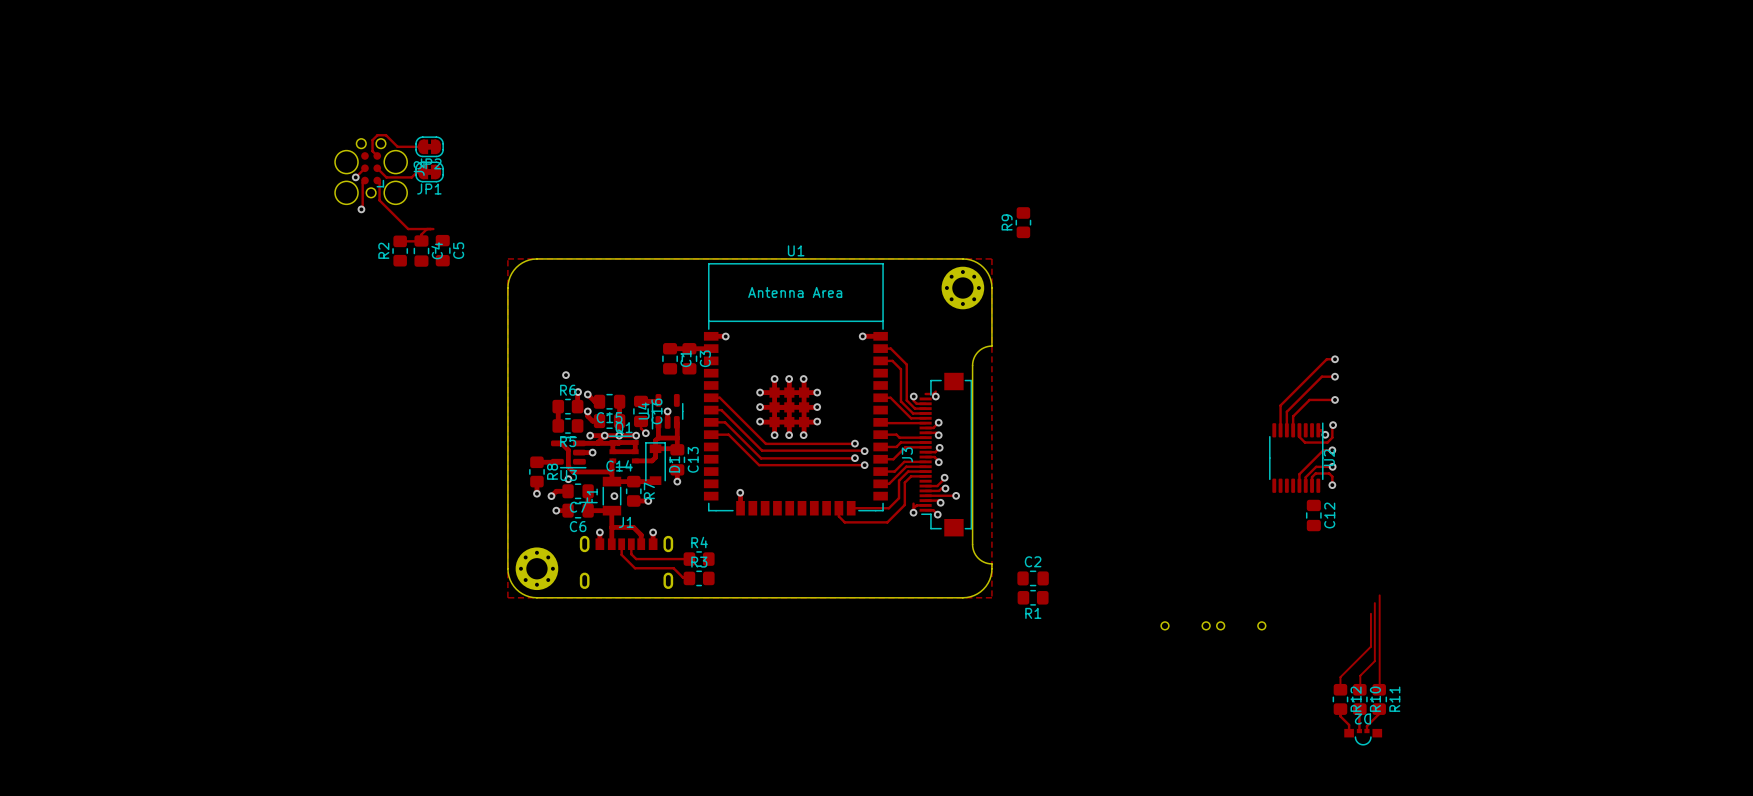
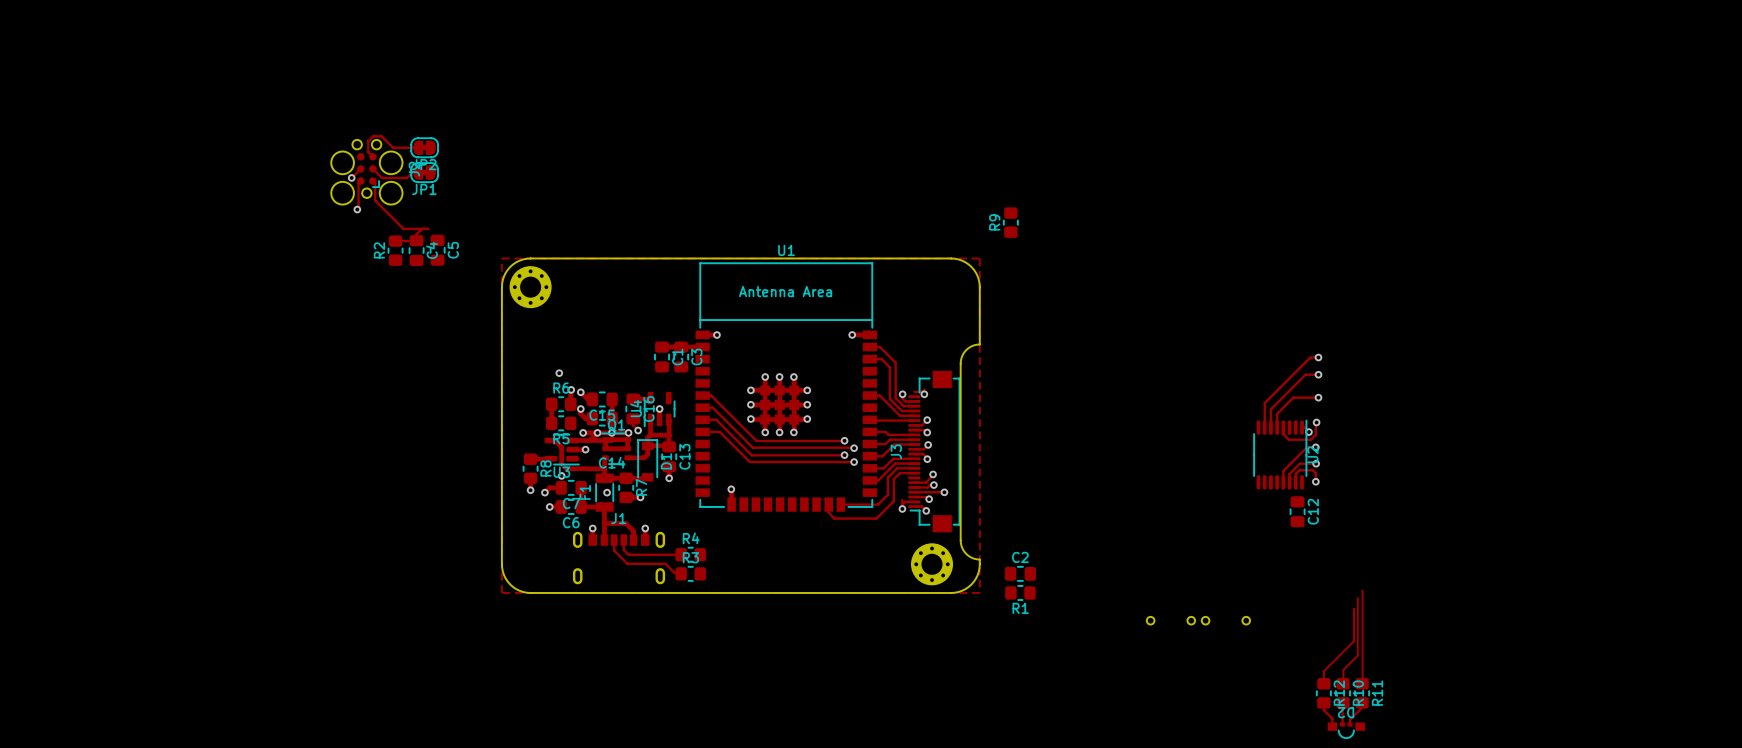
part: none -> (530, 287)
part: (962, 288) -> none
part: (536, 568) -> none
part: none -> (932, 564)

